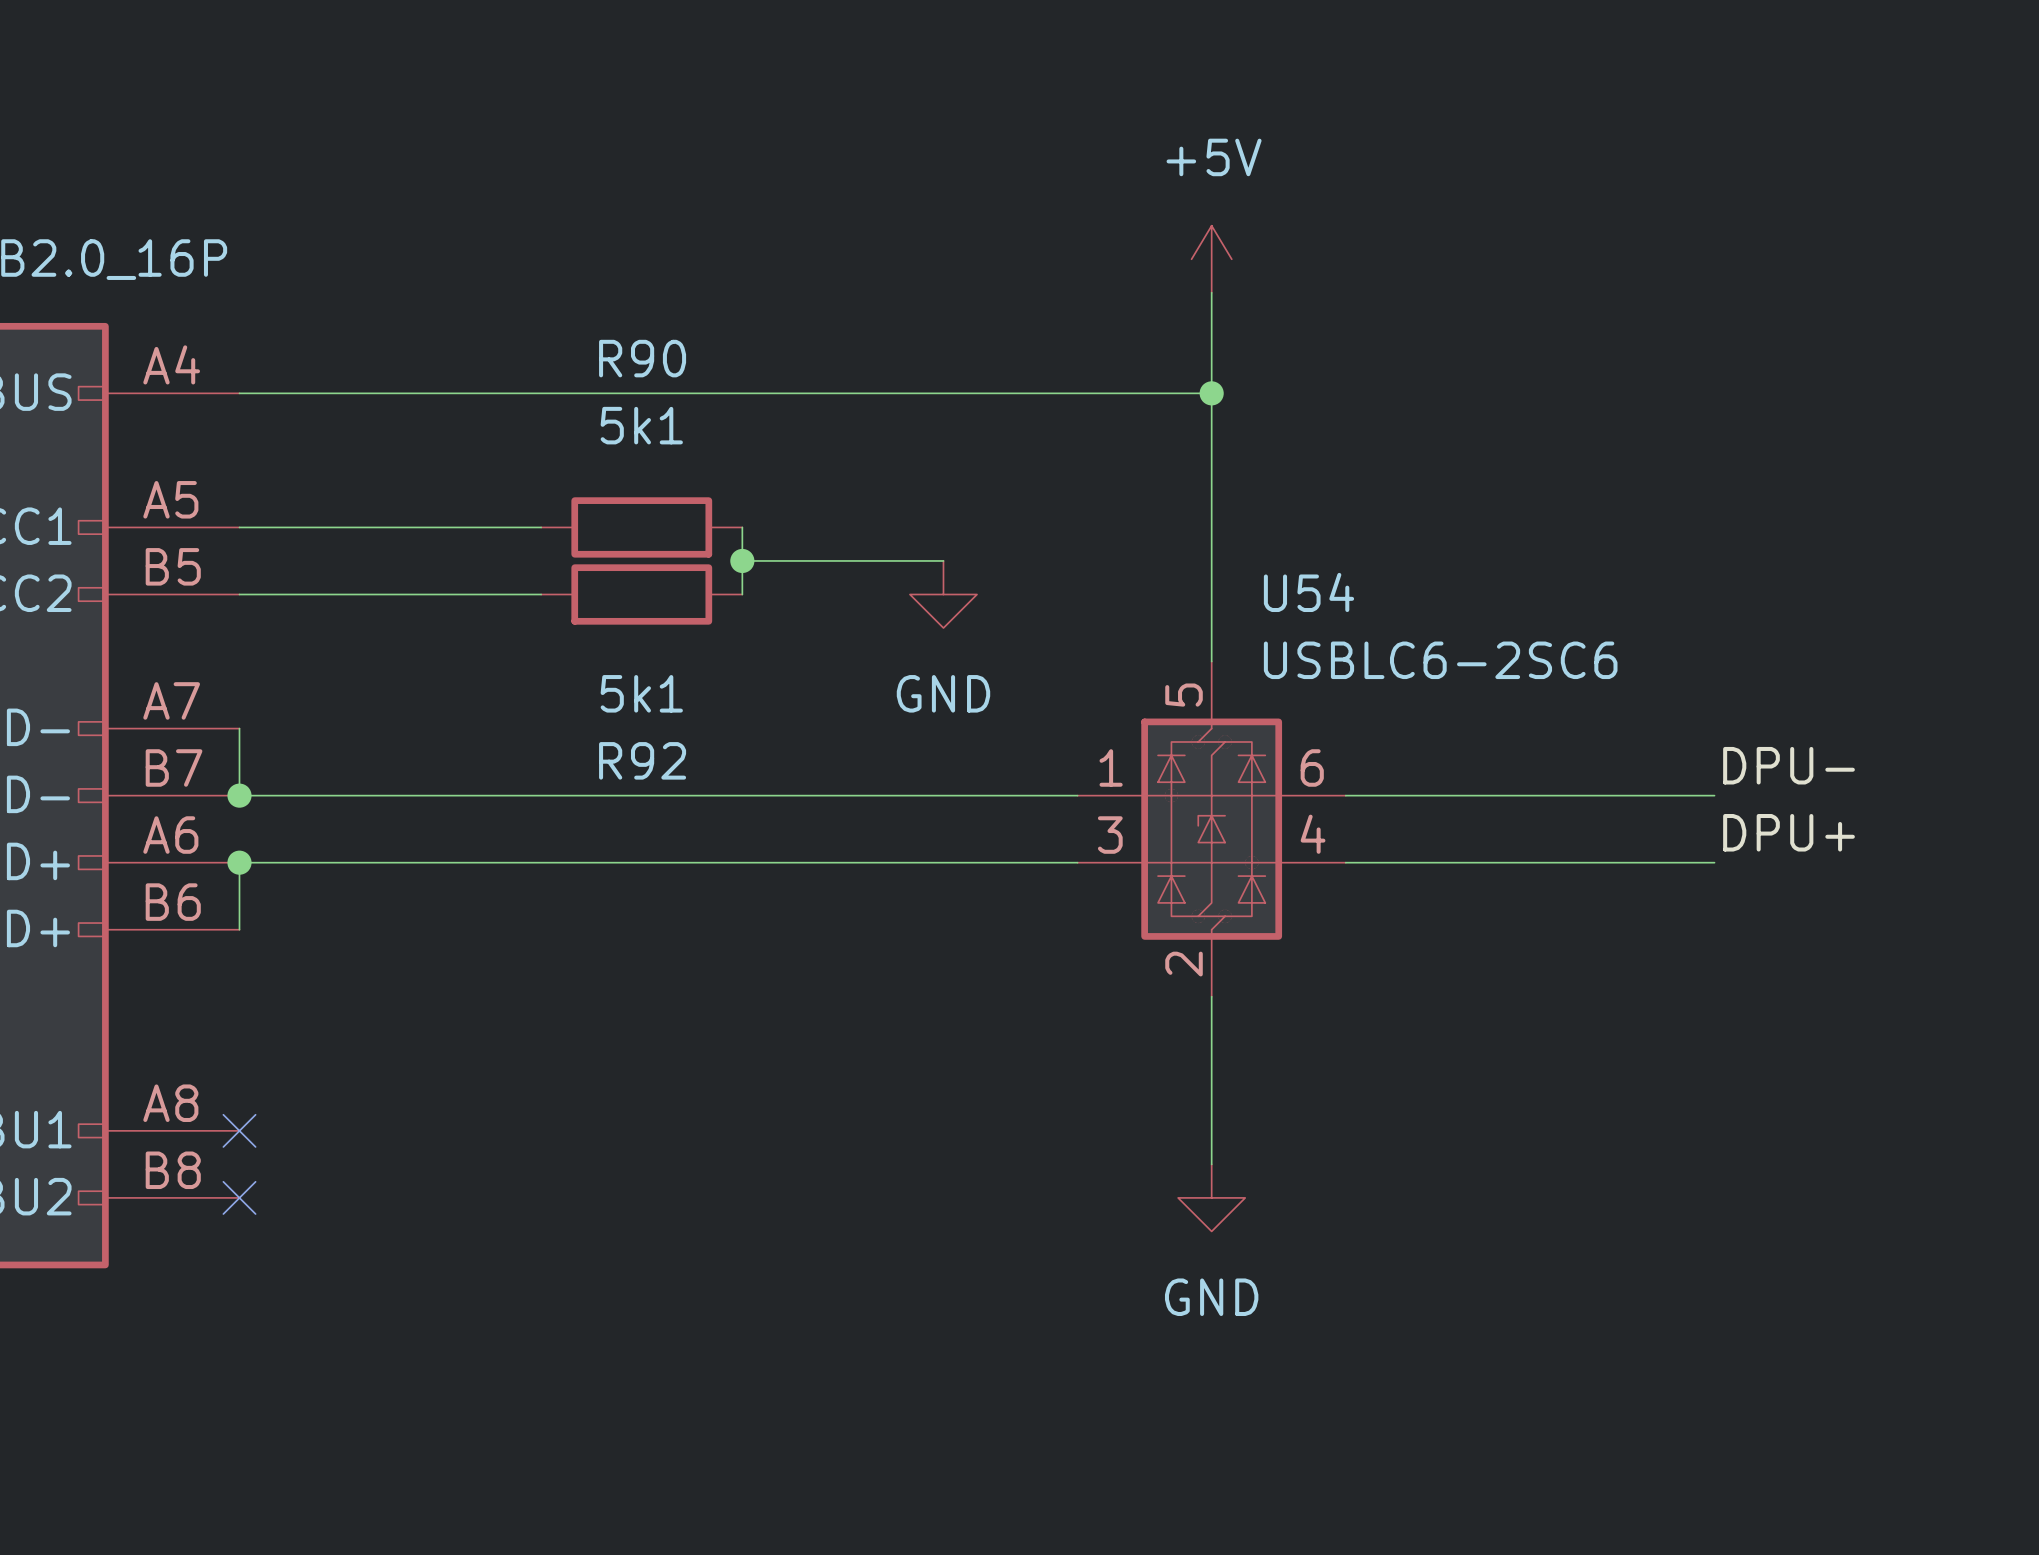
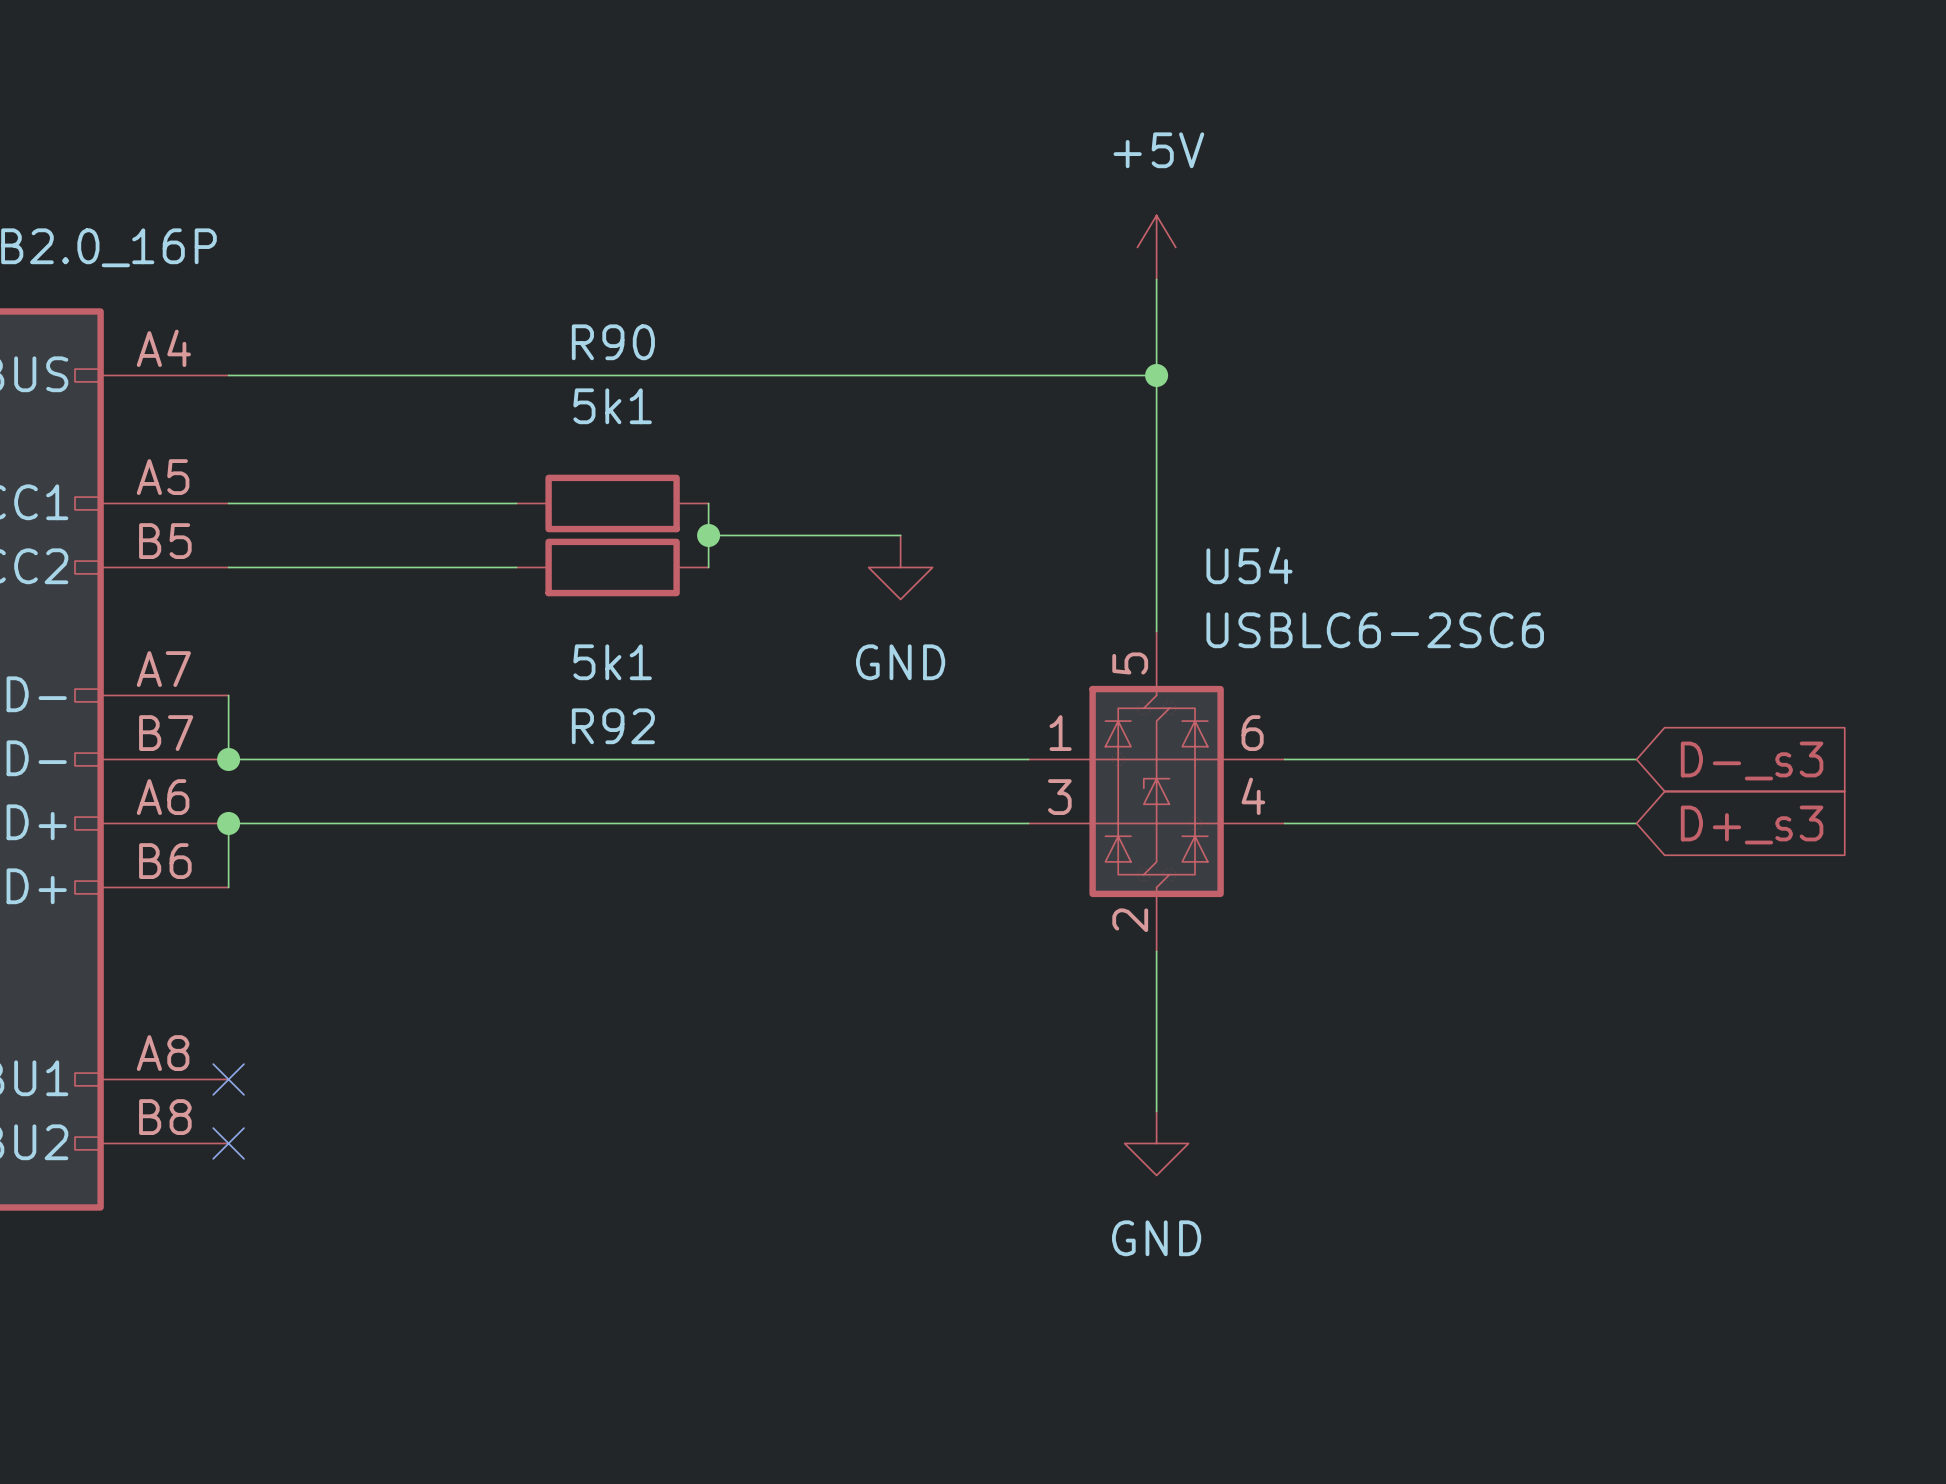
label: DPU- (1789, 765) -> none
global label: none -> D-_s3 (1752, 761)
label: DPU+ (1789, 832) -> none
global label: none -> D+_s3 (1752, 825)

